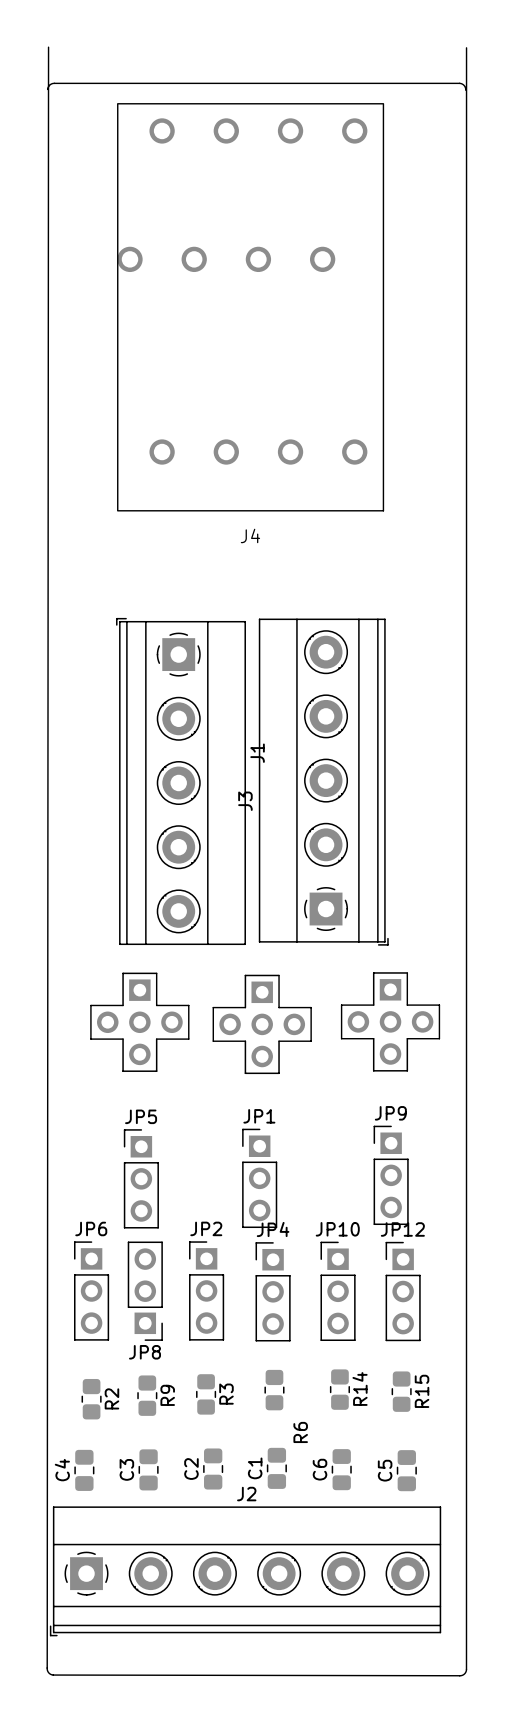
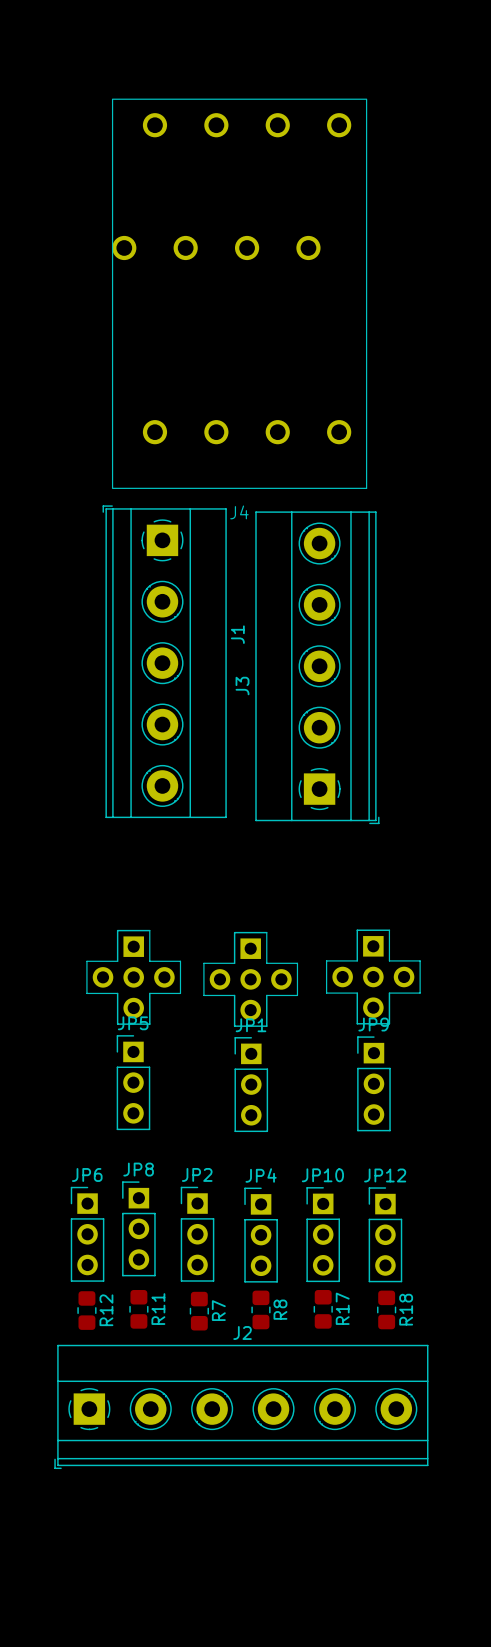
board edge: (48, 47) (47, 1670) (53, 1675) (459, 1675) (464, 1674) (466, 1669) (466, 47) -> none
board edge: (47, 89) (49, 85) (54, 83) (459, 83) (464, 85) (465, 90) -> none
J1 position: (181, 781) -> (164, 661)
J3 position: (323, 782) -> (317, 667)
JP9 position: (391, 1175) -> (373, 1083)
JP5 position: (141, 1178) -> (133, 1082)
JP1 position: (259, 1178) -> (251, 1084)
JP8 rotation: 0° (145, 1291) -> 180° (138, 1228)
R11: none -> (138, 1309)
R17: none -> (323, 1309)
R12: none -> (86, 1310)
R8: none -> (260, 1309)
R18: none -> (386, 1309)
R7: none -> (199, 1311)
R14: (339, 1389) -> none
R6: (274, 1390) -> none
R15: (401, 1391) -> none
R3: (206, 1394) -> none
R9: (147, 1395) -> none
R2: (91, 1399) -> none
C1: (276, 1468) -> none
C3: (148, 1469) -> none
C2: (213, 1469) -> none
C6: (341, 1469) -> none
C4: (84, 1470) -> none
C5: (406, 1470) -> none
J2 position: (245, 1571) -> (241, 1406)

